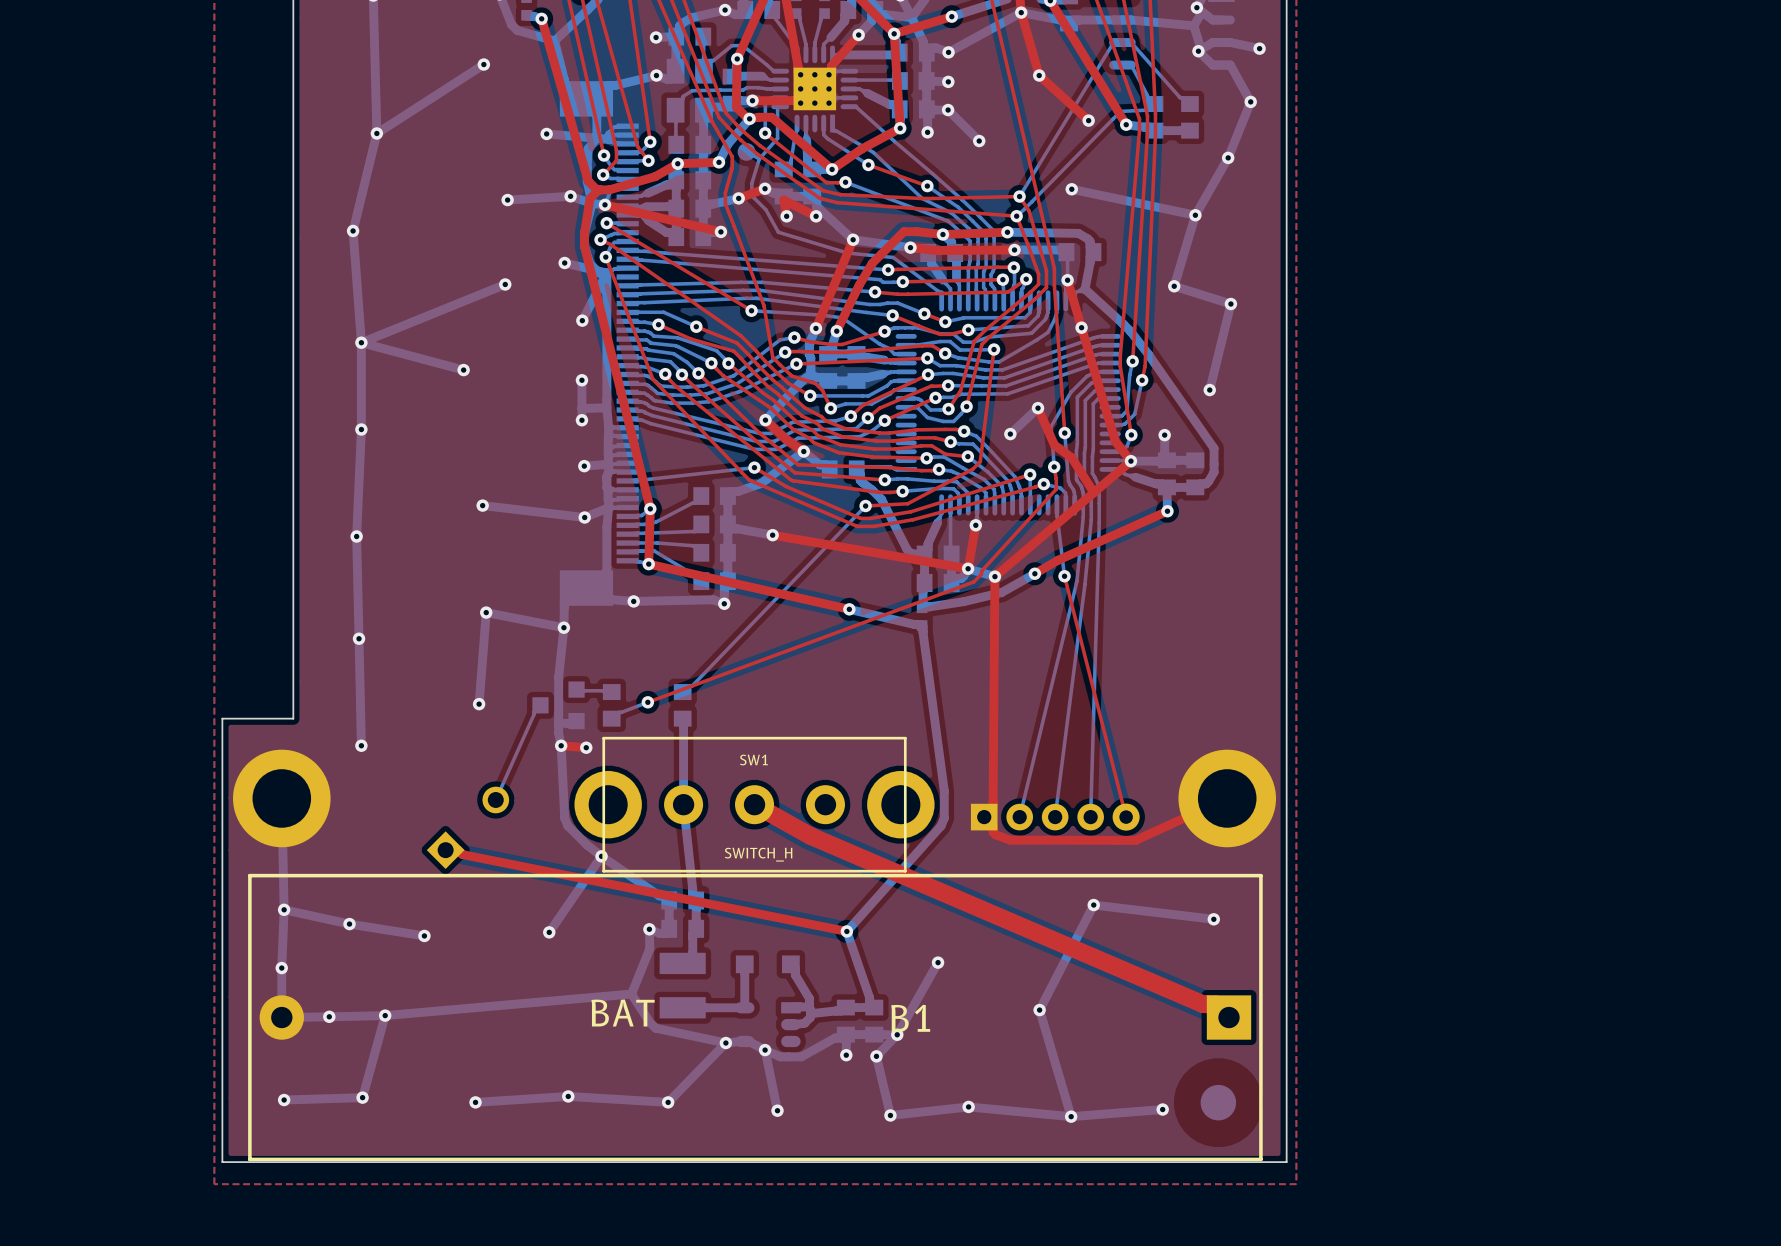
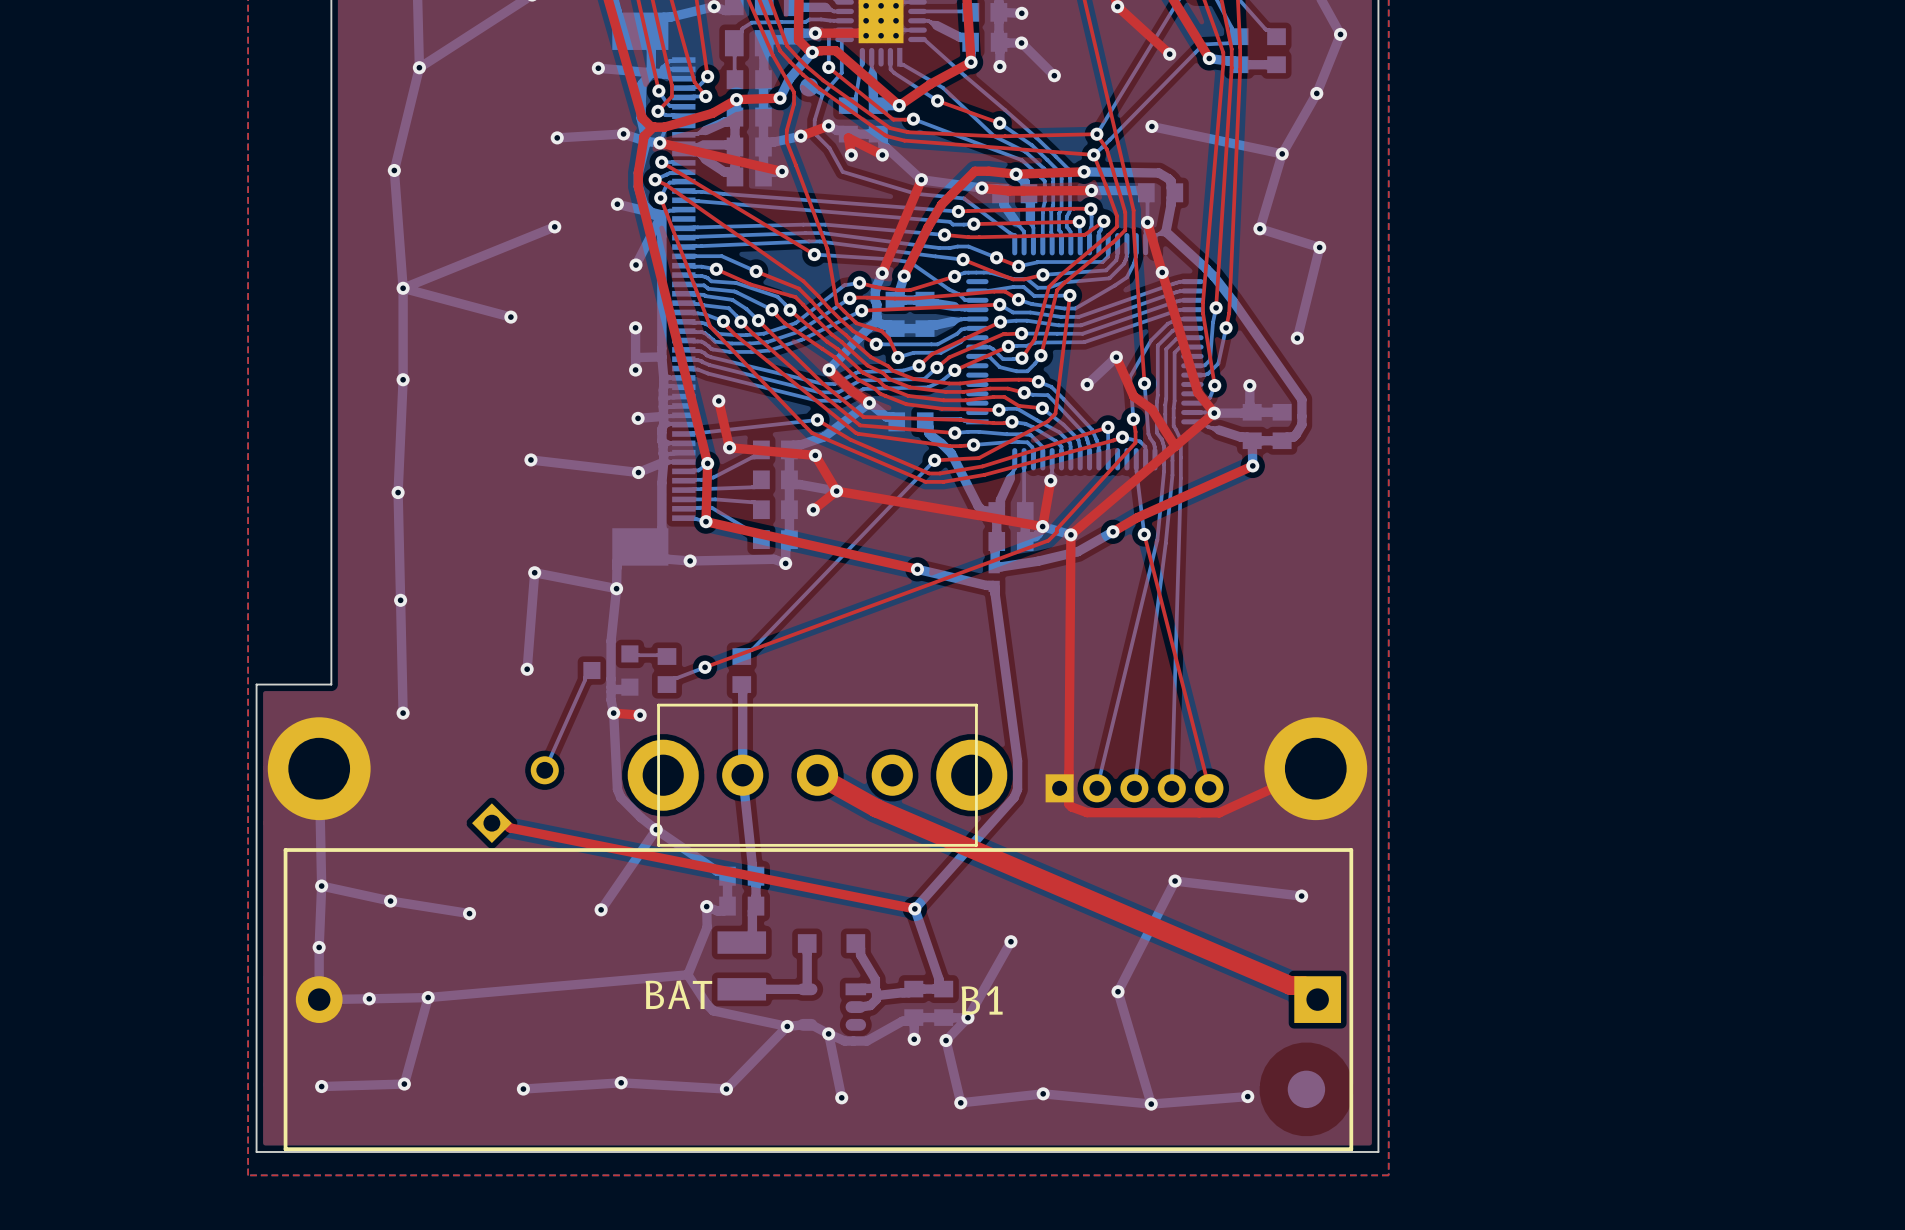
top track: none -> (718, 400) (729, 447) (815, 455) (836, 491) (813, 509)
via: none -> (718, 400)
via: none -> (729, 447)
via: none -> (815, 455)
via: none -> (813, 509)
SW1 name: SW1 (753, 759) -> none
SW1 value: SWITCH_H (758, 854) -> none

